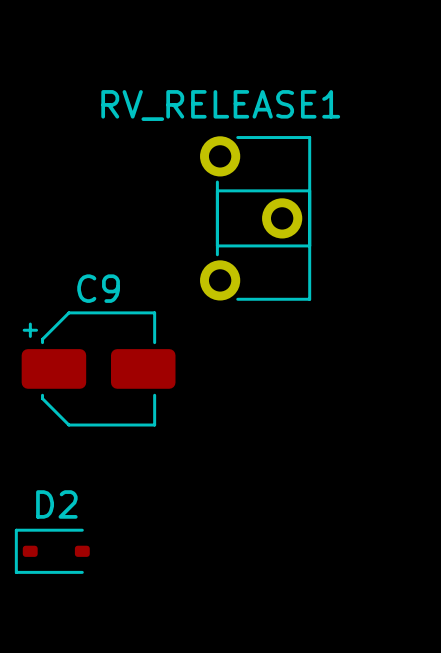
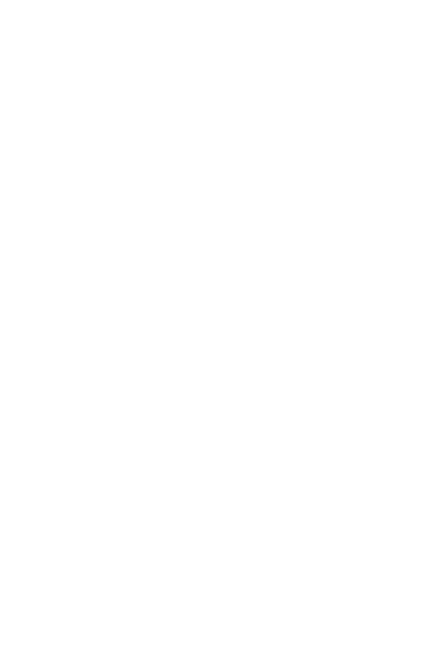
RV_RELEASE1: (255, 218) -> none
C9: (98, 368) -> none
D2: (52, 551) -> none

